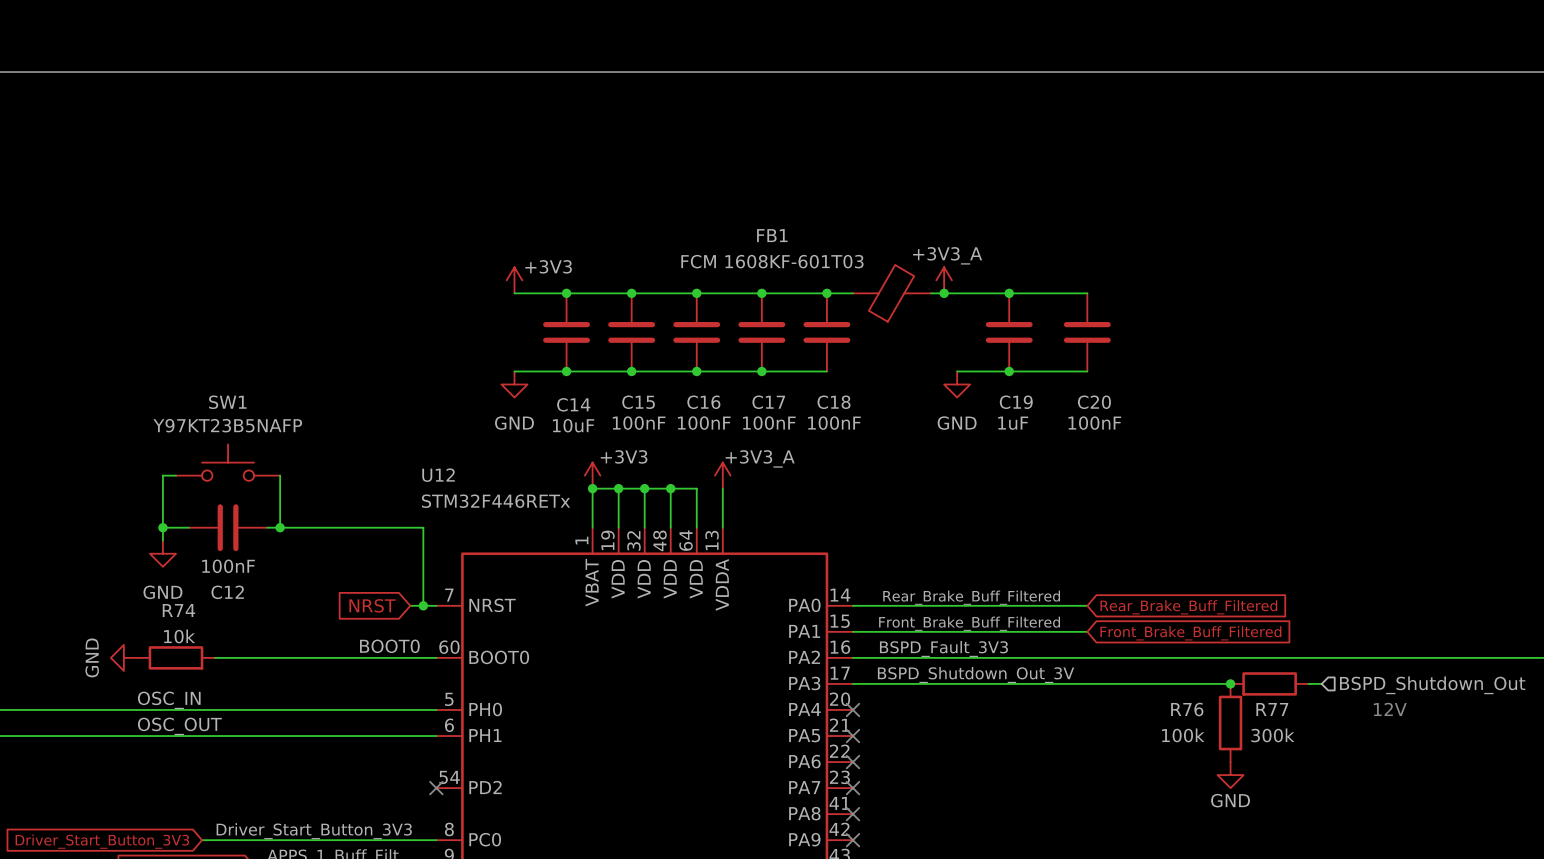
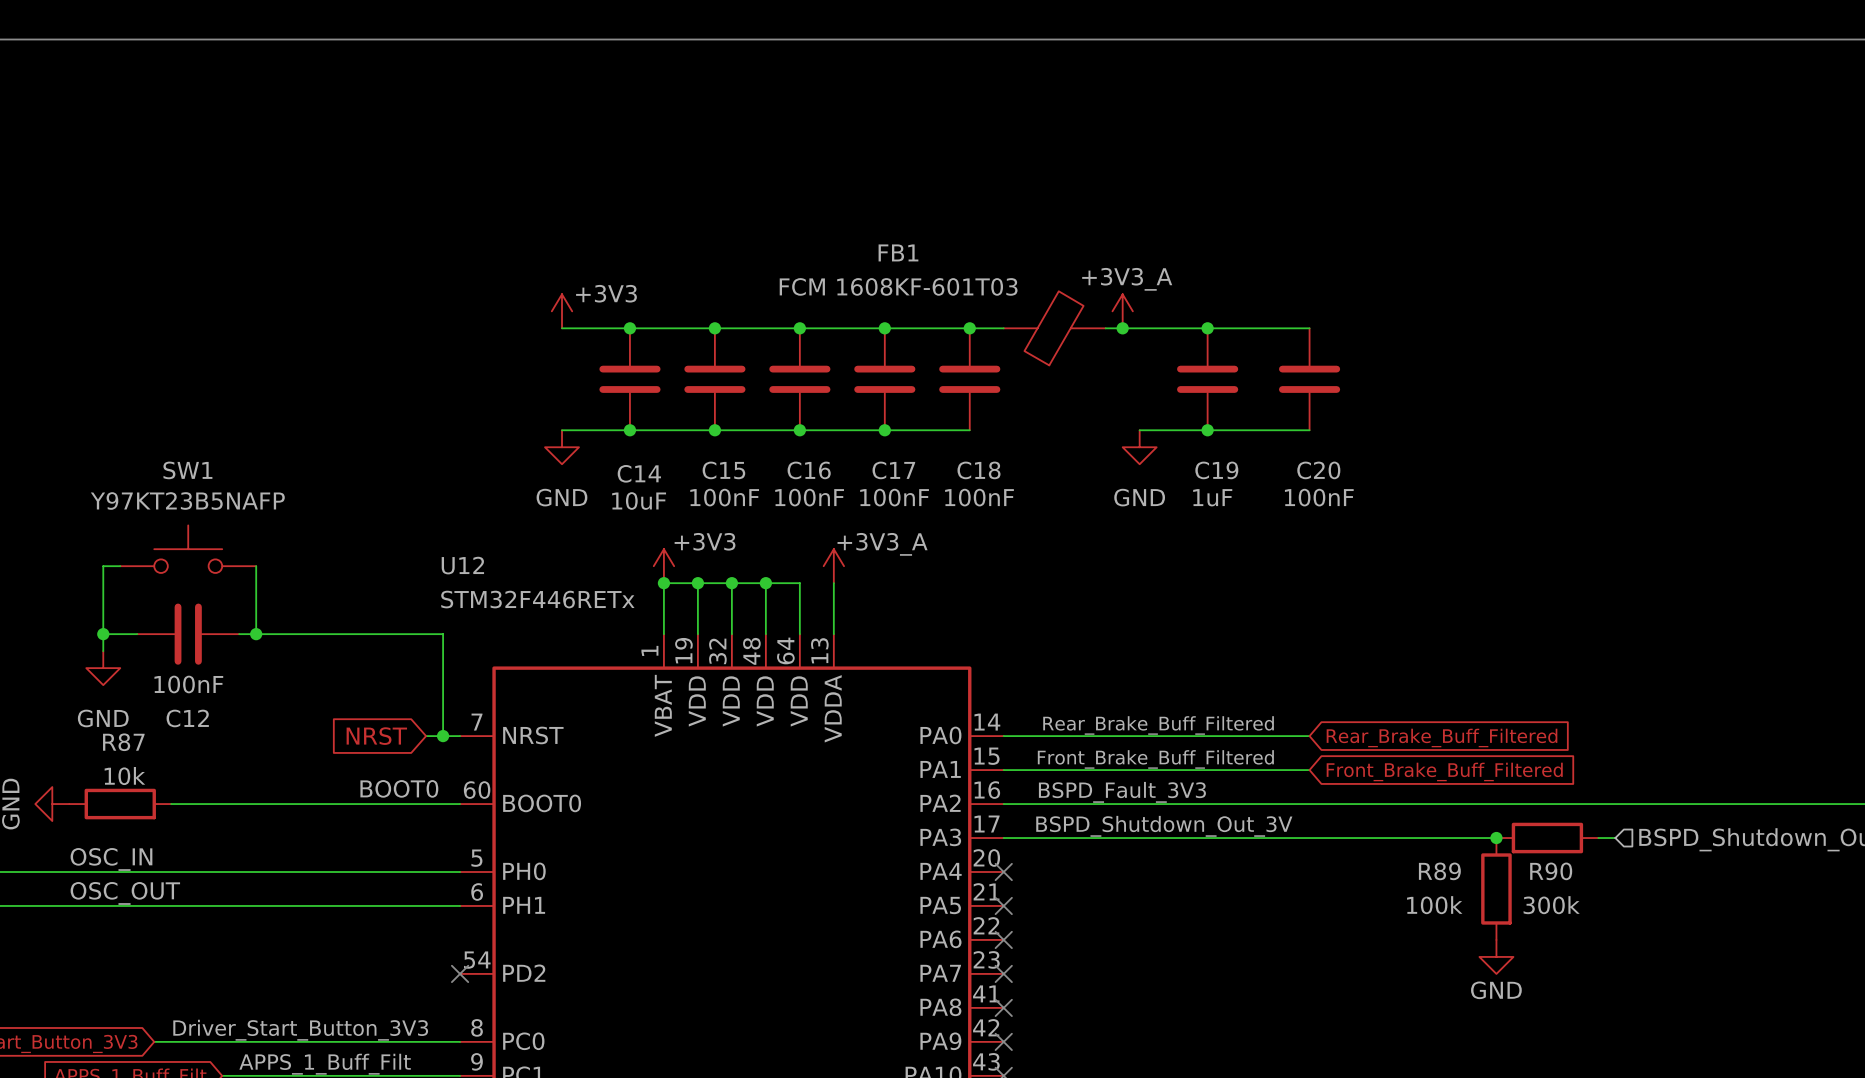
R74 name: R74 (178, 610) -> R87 (123, 742)
R76 name: R76 (1187, 709) -> R89 (1439, 871)
R77 name: R77 (1272, 709) -> R90 (1551, 871)
text: 12V (1390, 709) -> none

